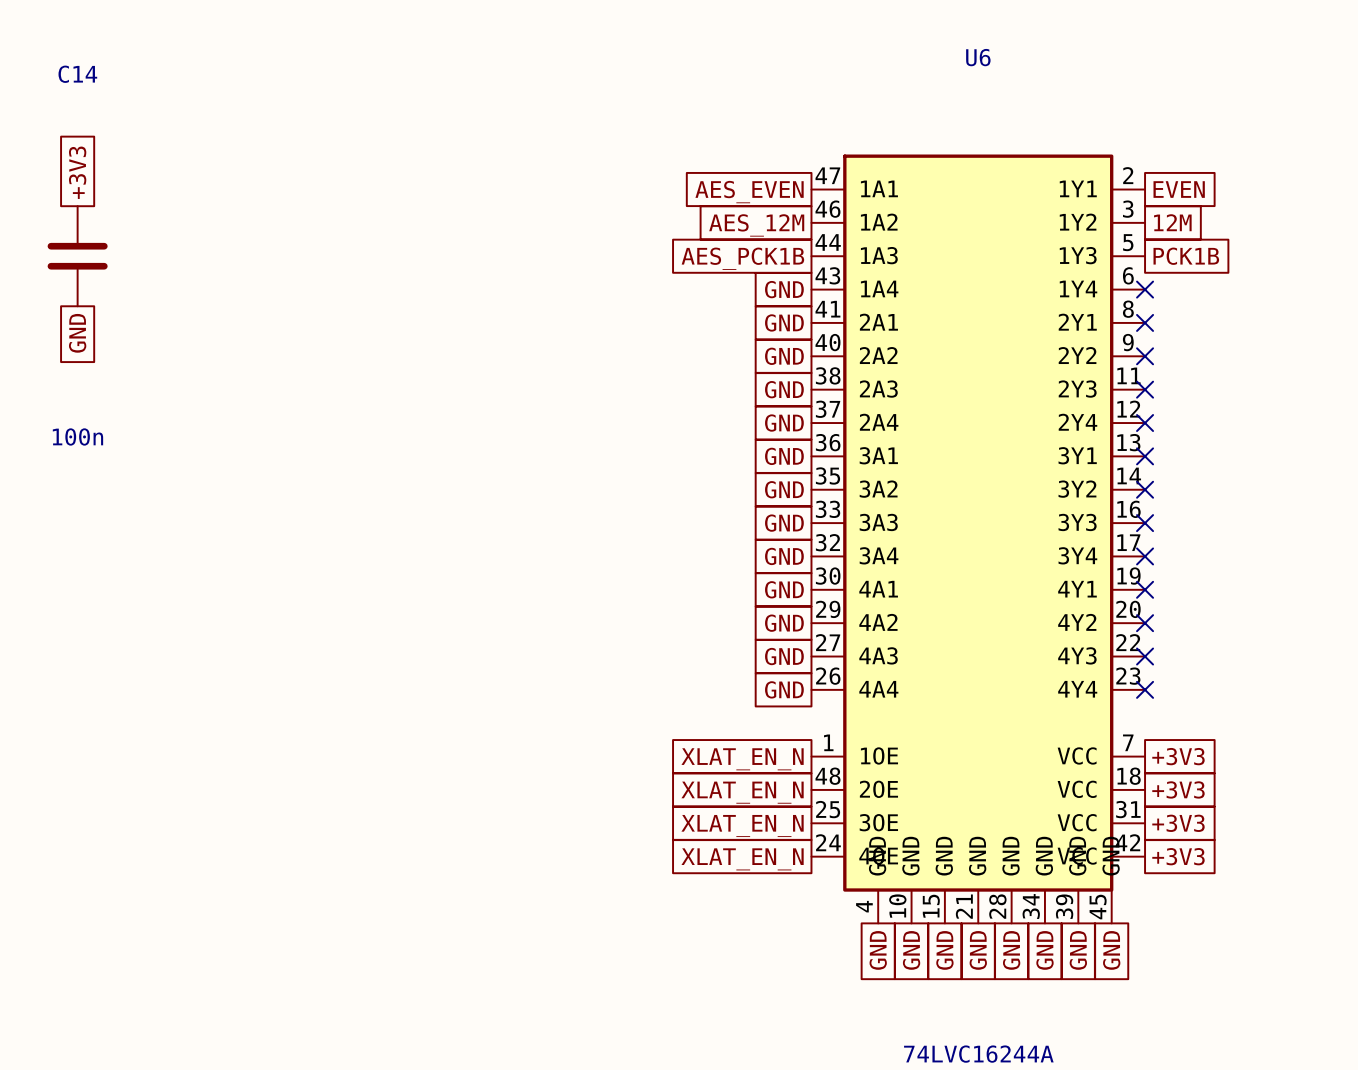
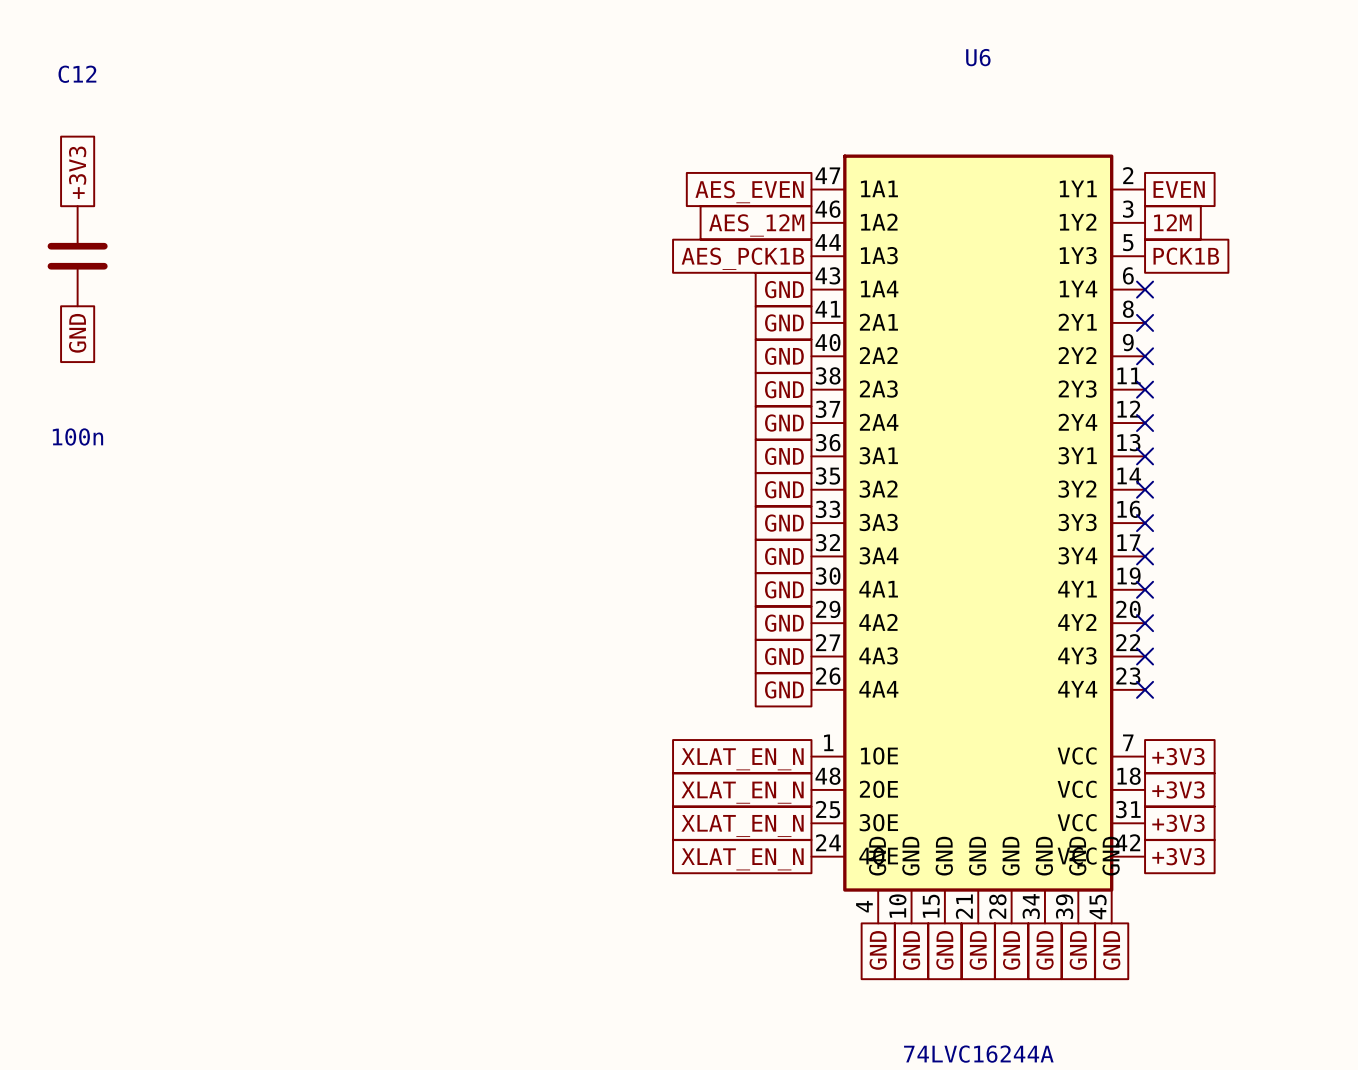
C14 name: C14 (77, 74) -> C12 (77, 74)

